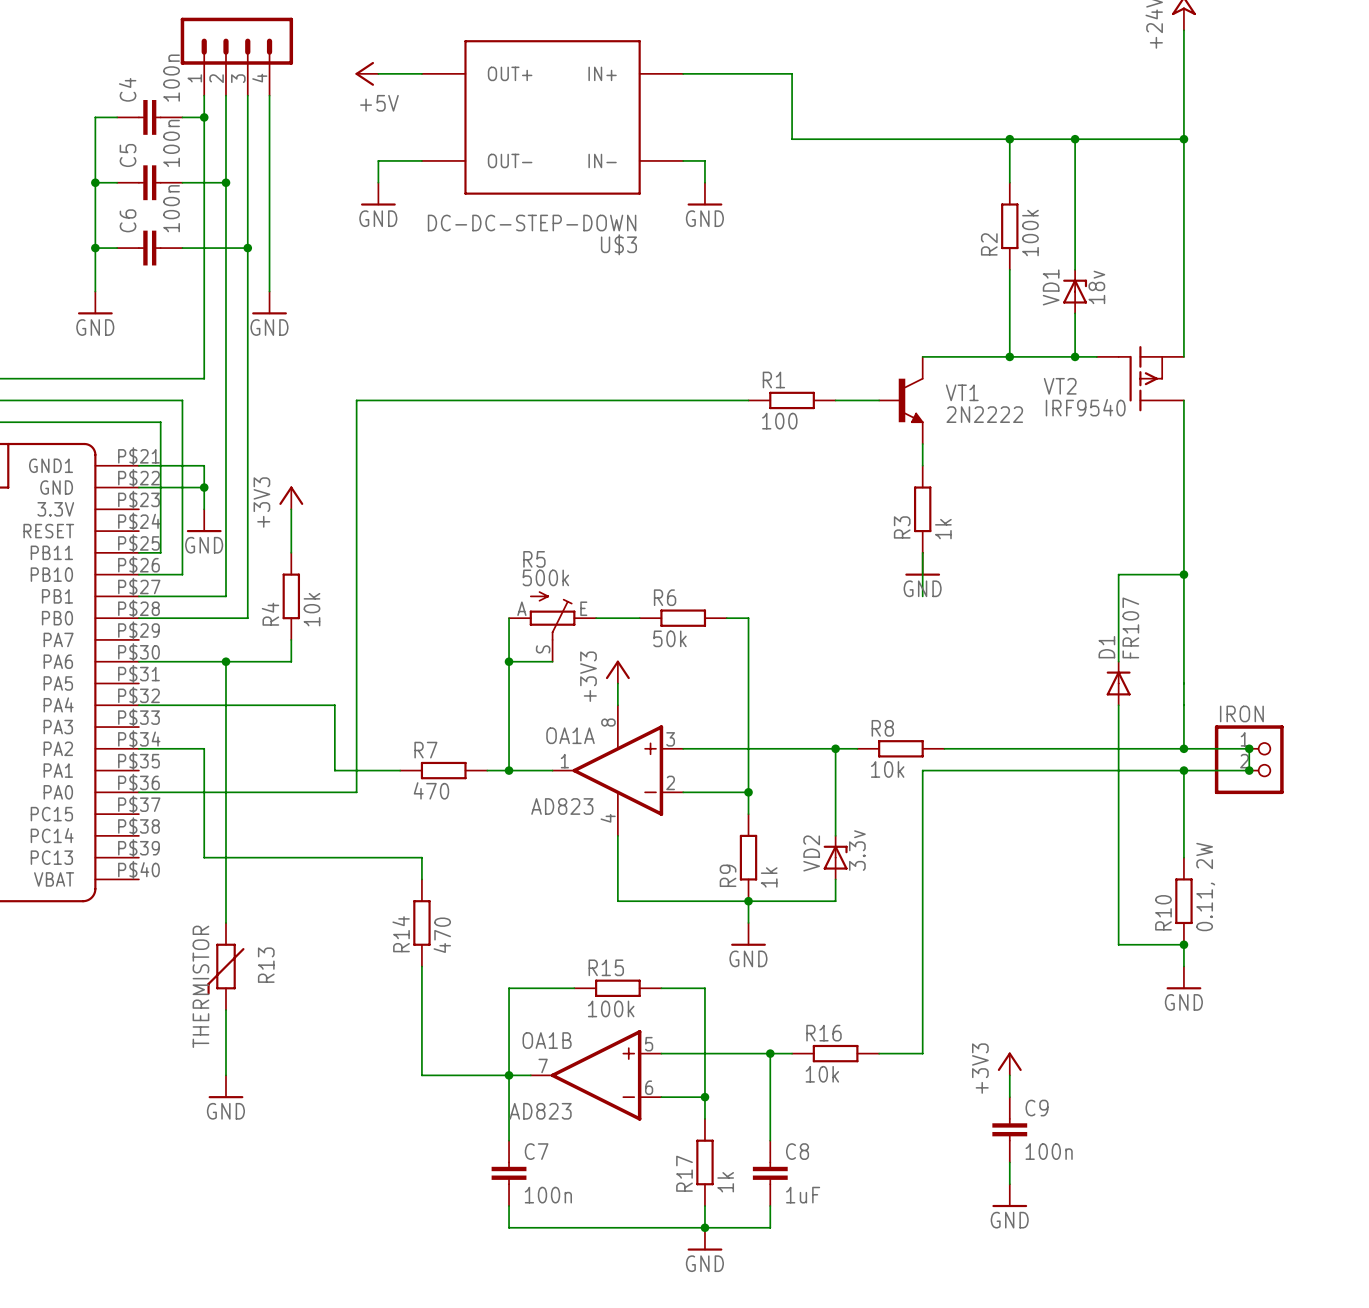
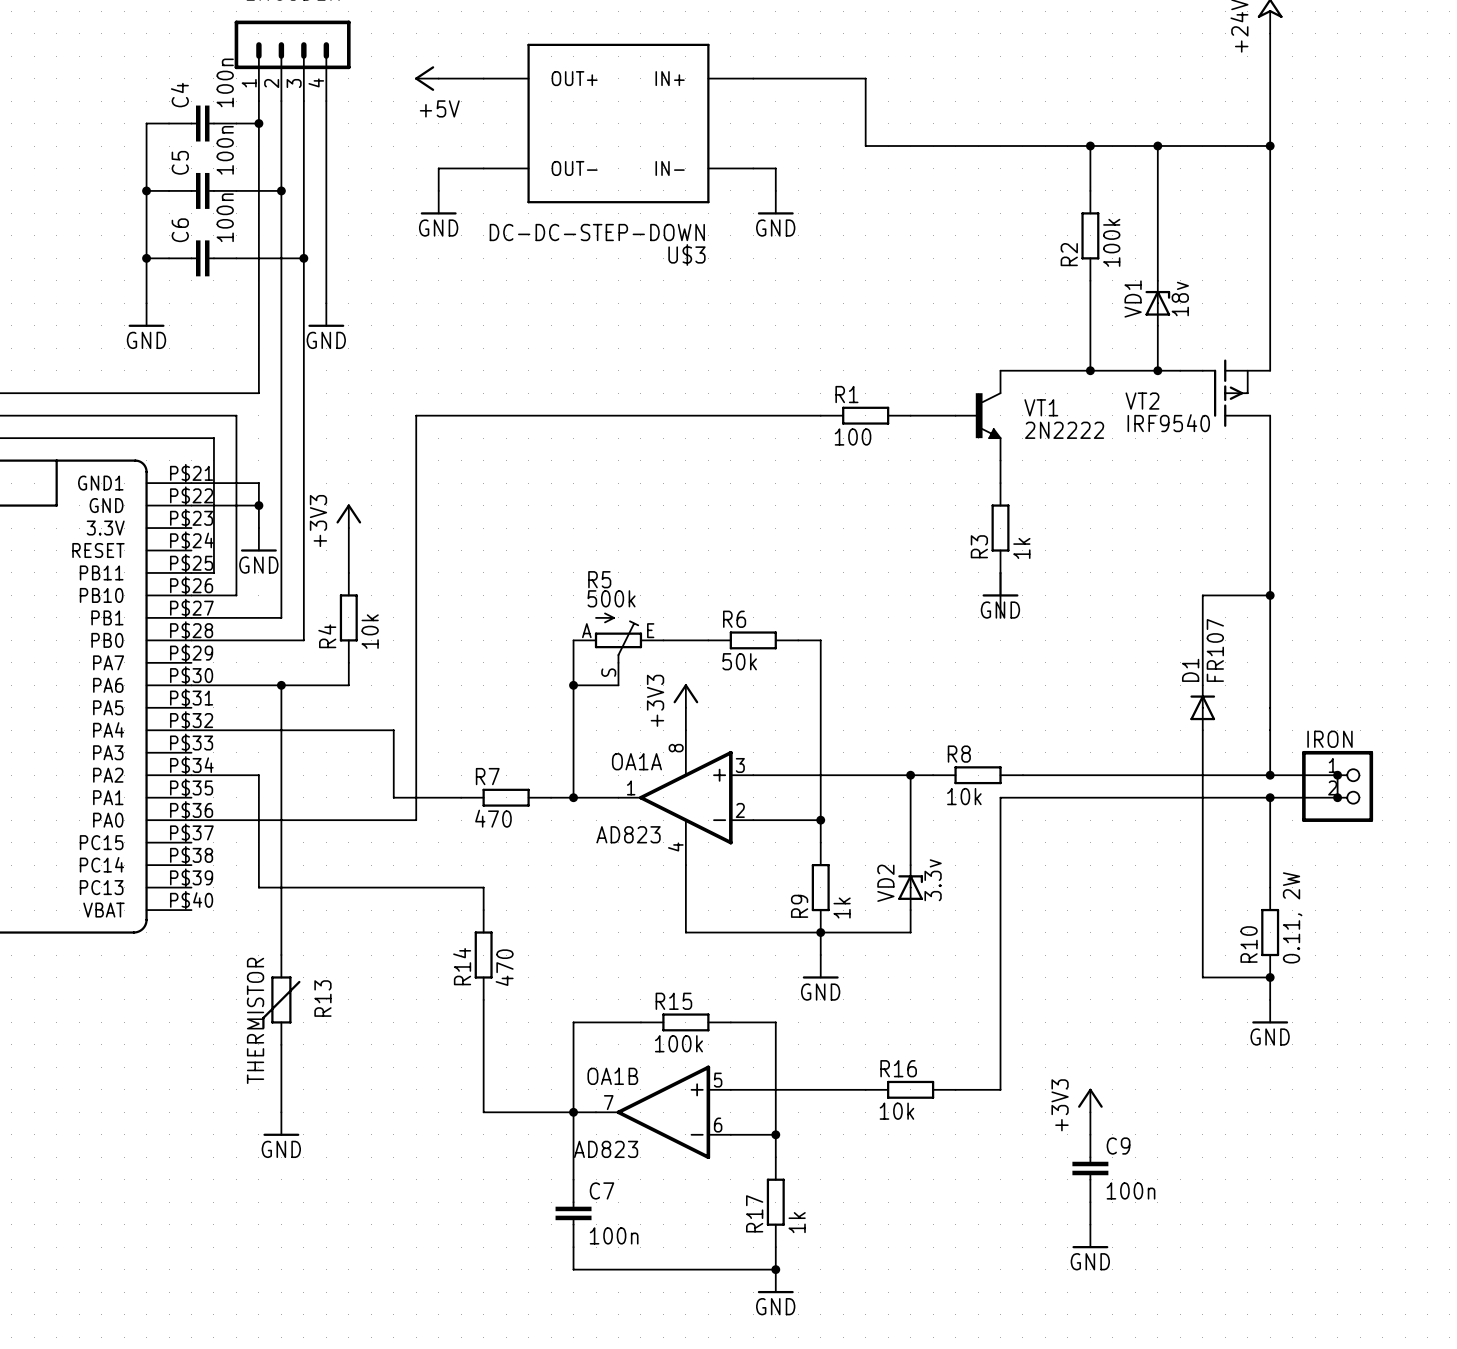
wire: (770, 1053) (770, 1140) -> none
junction: (770, 1053) -> none
C8: 1uF (770, 1173) -> none
wire: (770, 1206) (770, 1227) (704, 1227) -> none

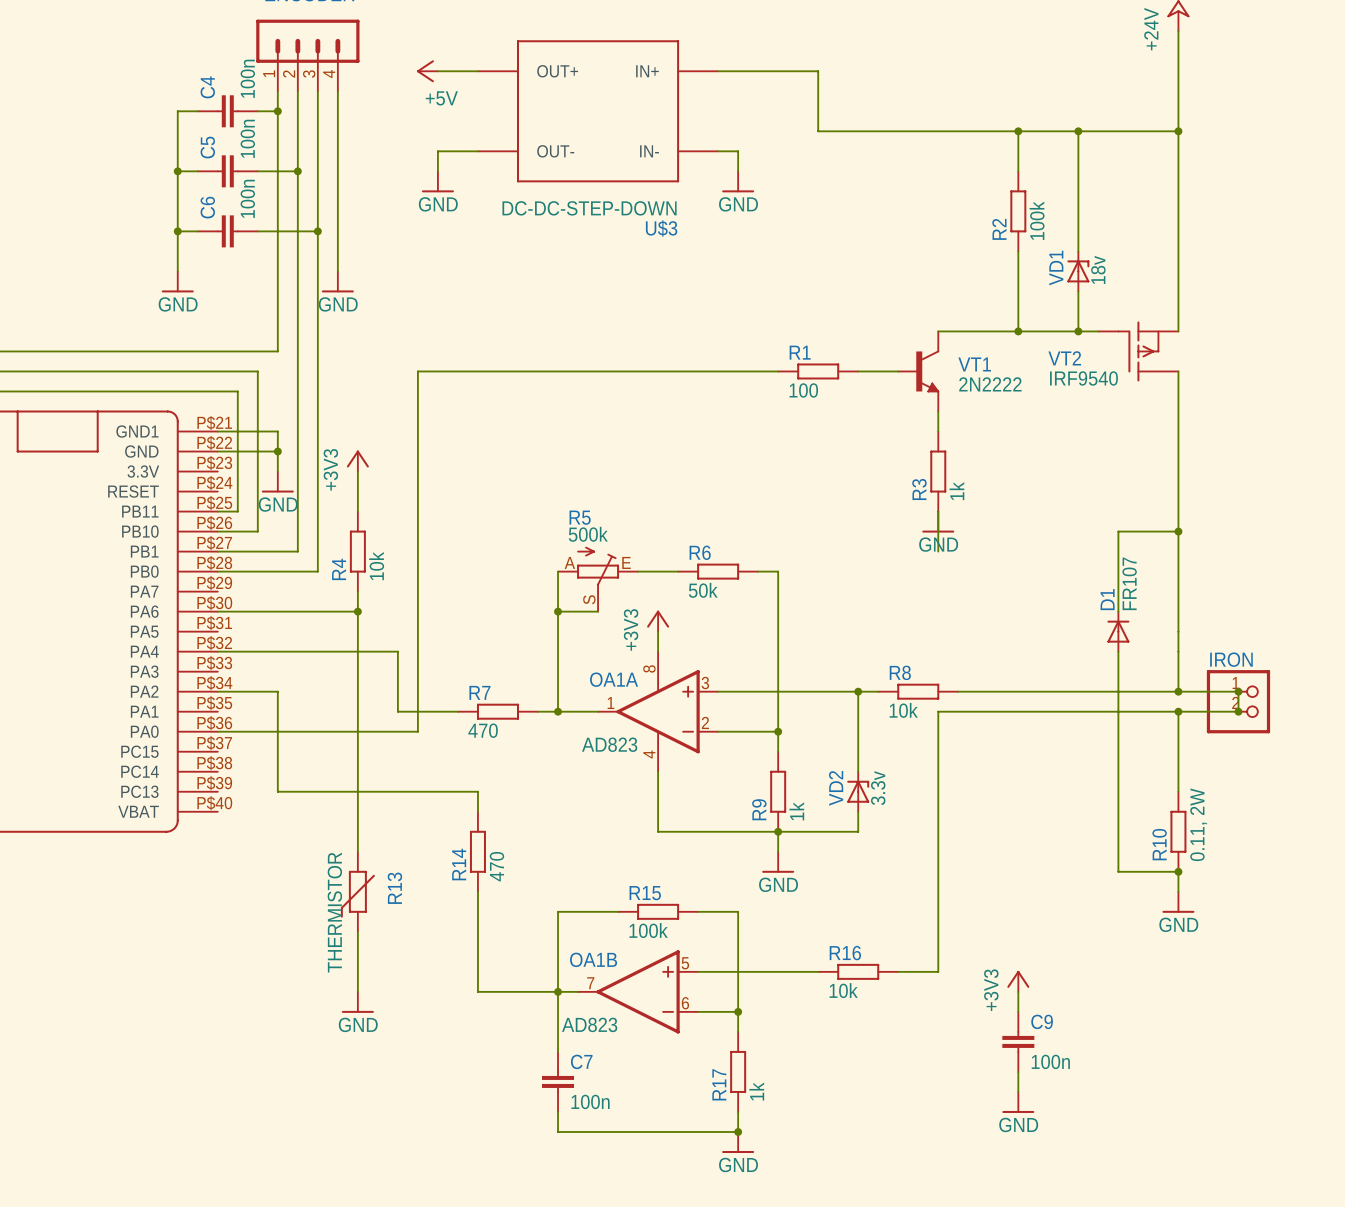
wire: (281, 685) (281, 955) -> (357, 611) (357, 851)
junction: (281, 685) -> none
junction: none -> (357, 611)
R13 position: (281, 999) -> (357, 891)
wire: (281, 1044) (281, 1112) -> (357, 931) (357, 991)
power symbol position: GND (281, 1124) -> GND (357, 1002)

